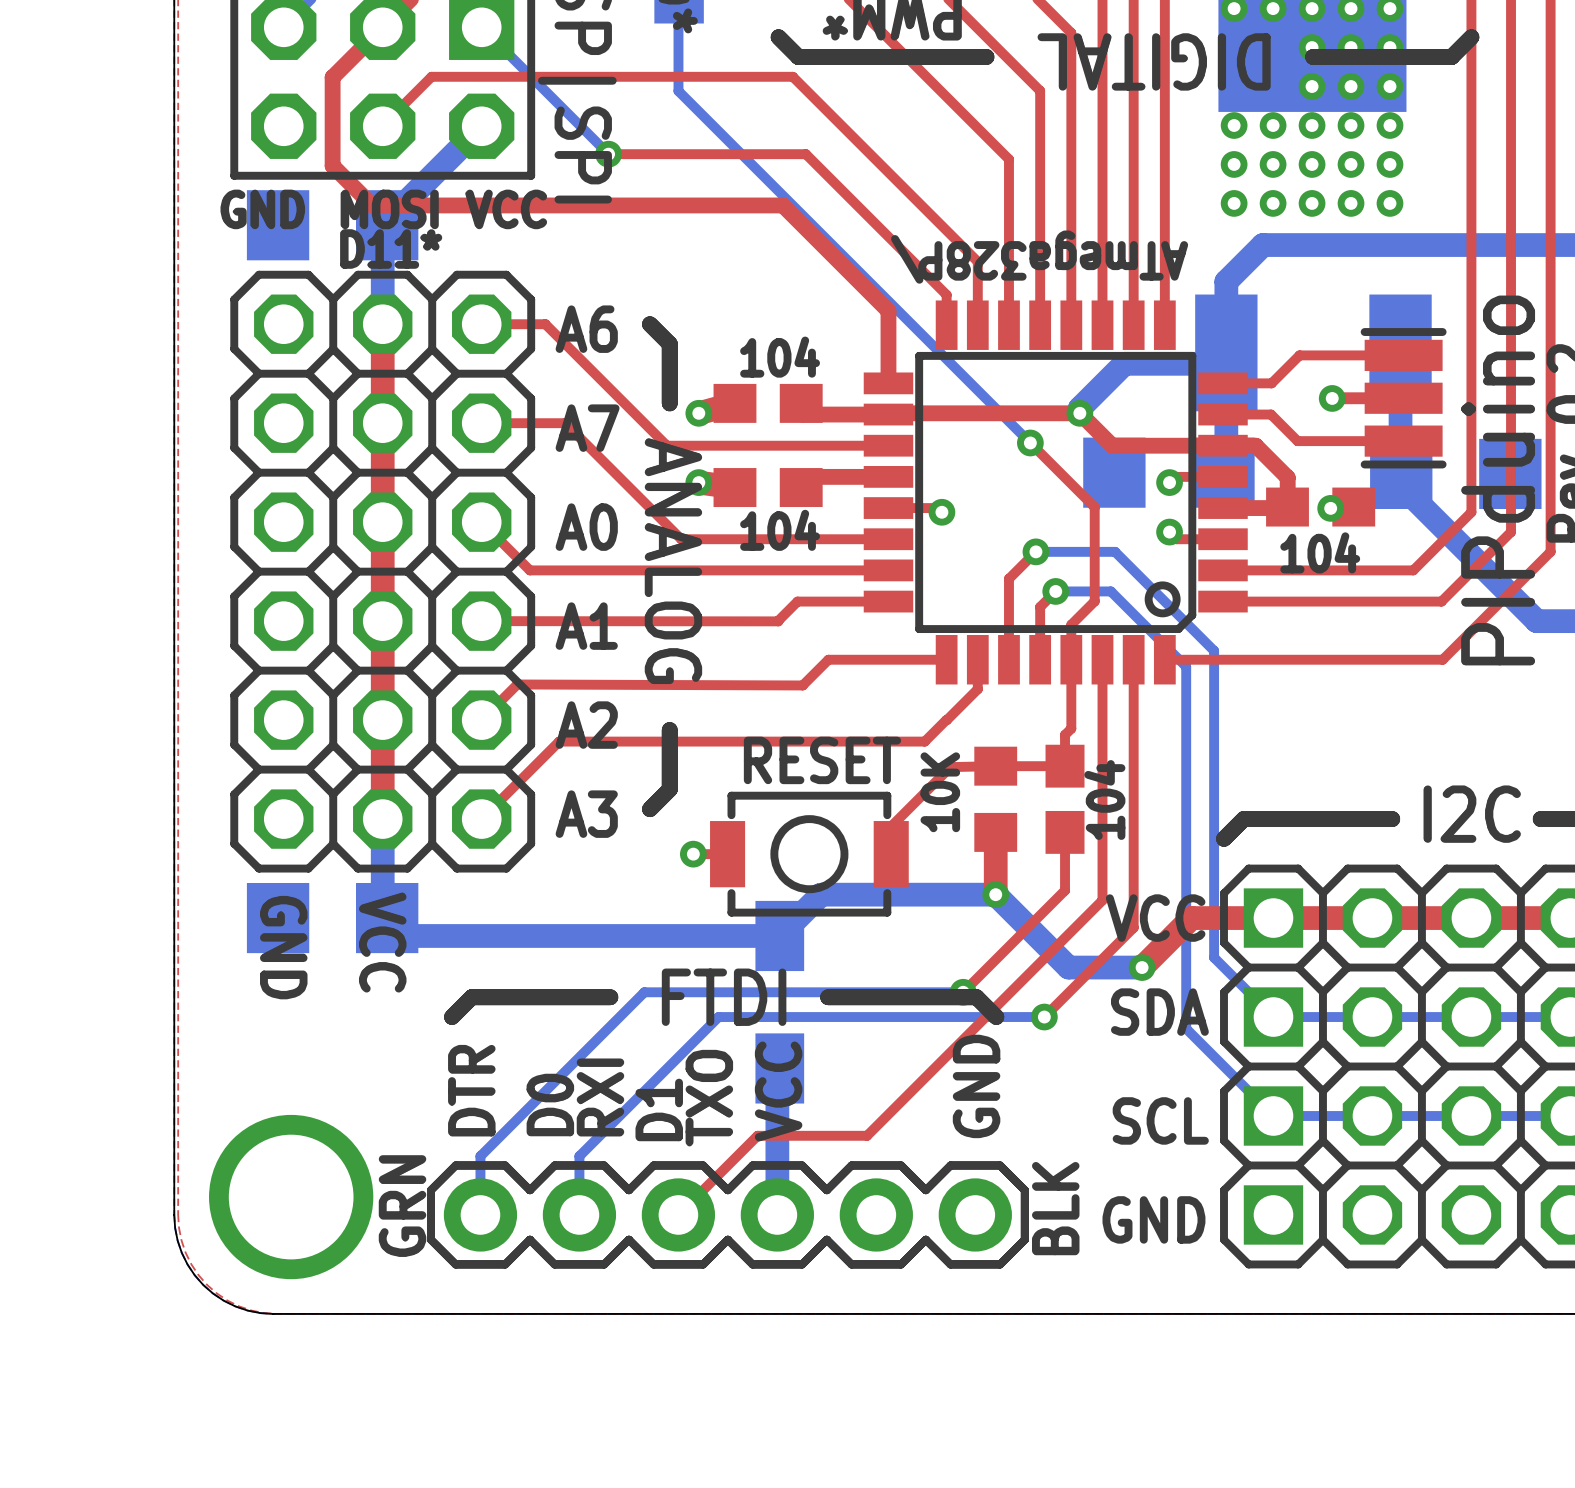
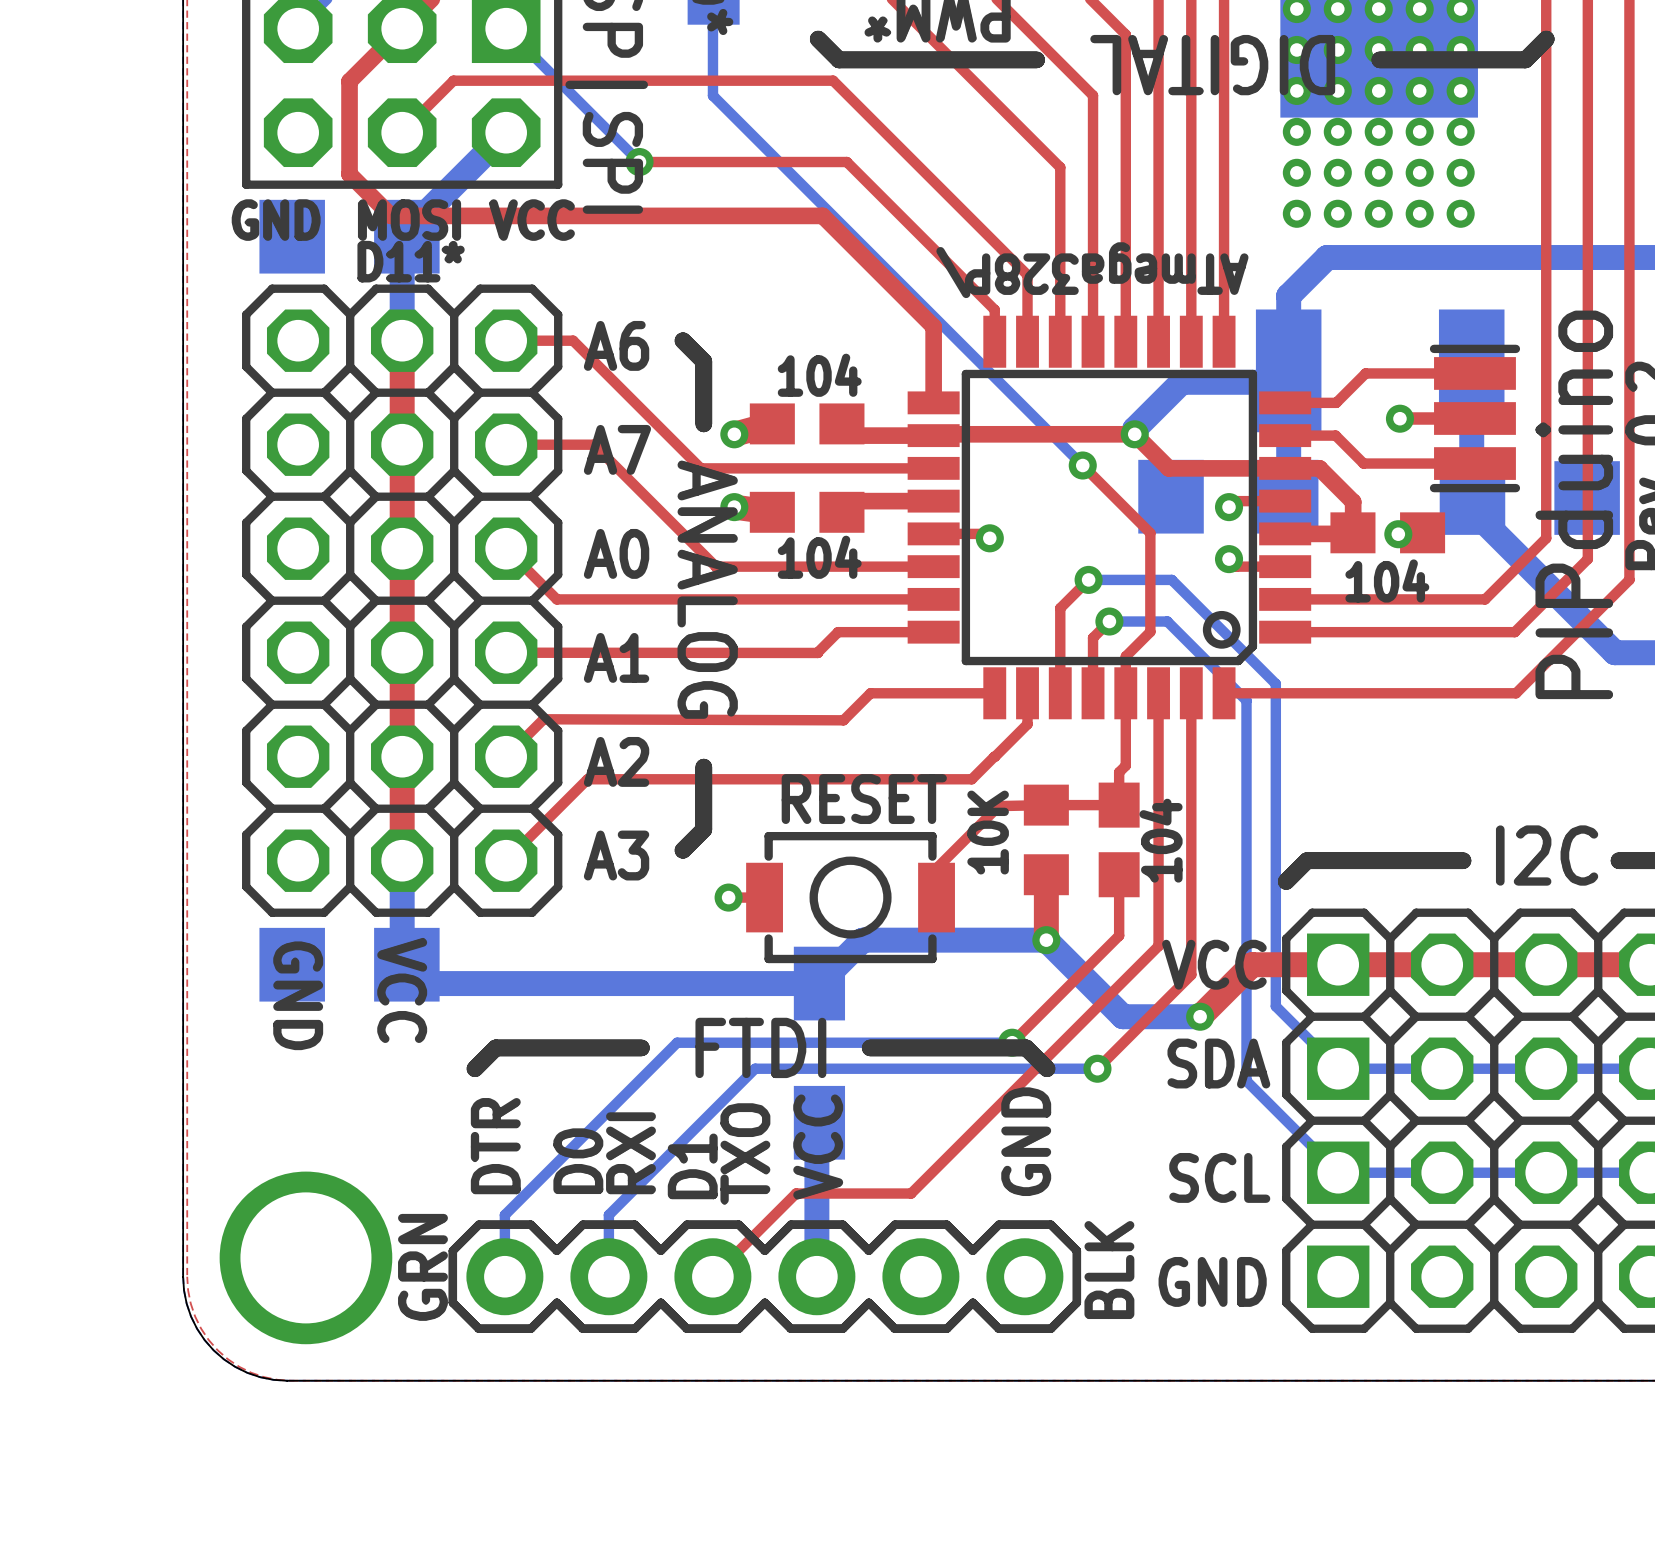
via: none -> (1296, 49)
via: none -> (1337, 49)
via: none -> (1296, 90)
via: none -> (1337, 90)

